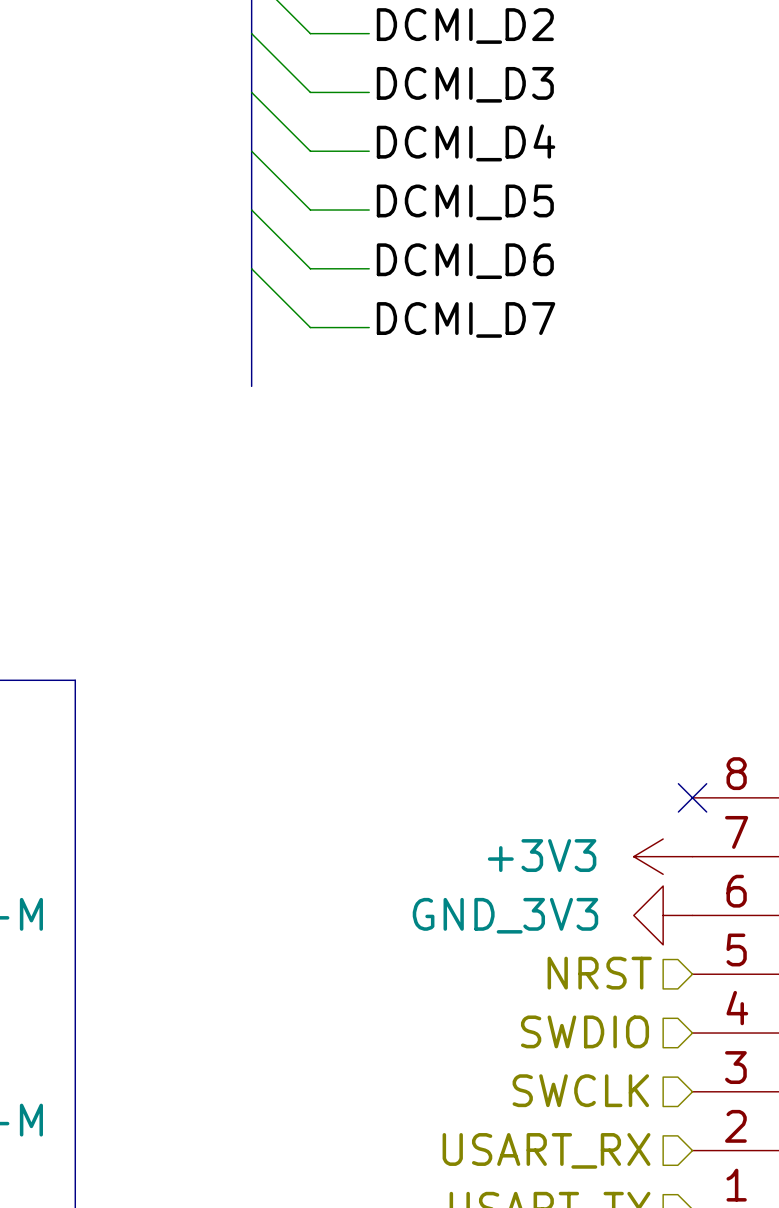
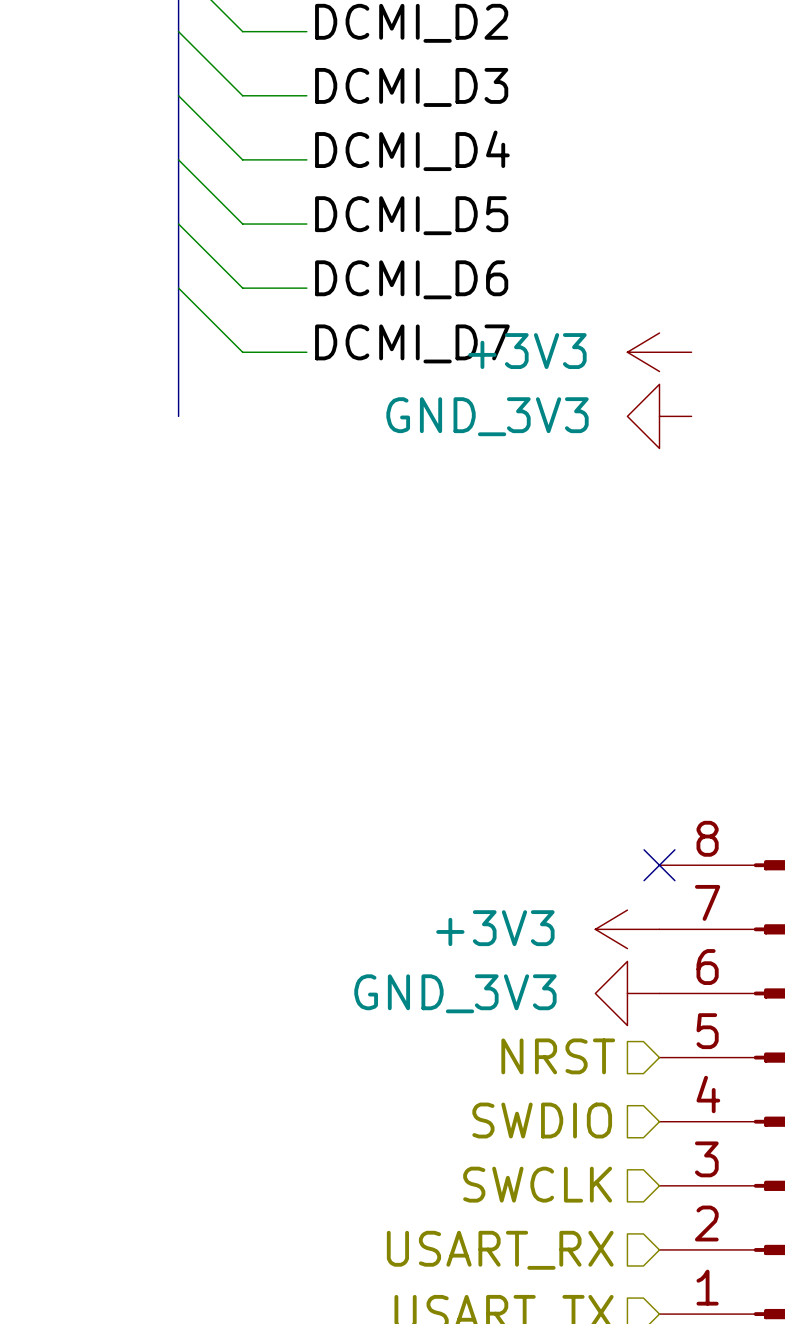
power symbol: none -> +3V3 (659, 352)
power symbol: none -> GND_3V3 (659, 416)

